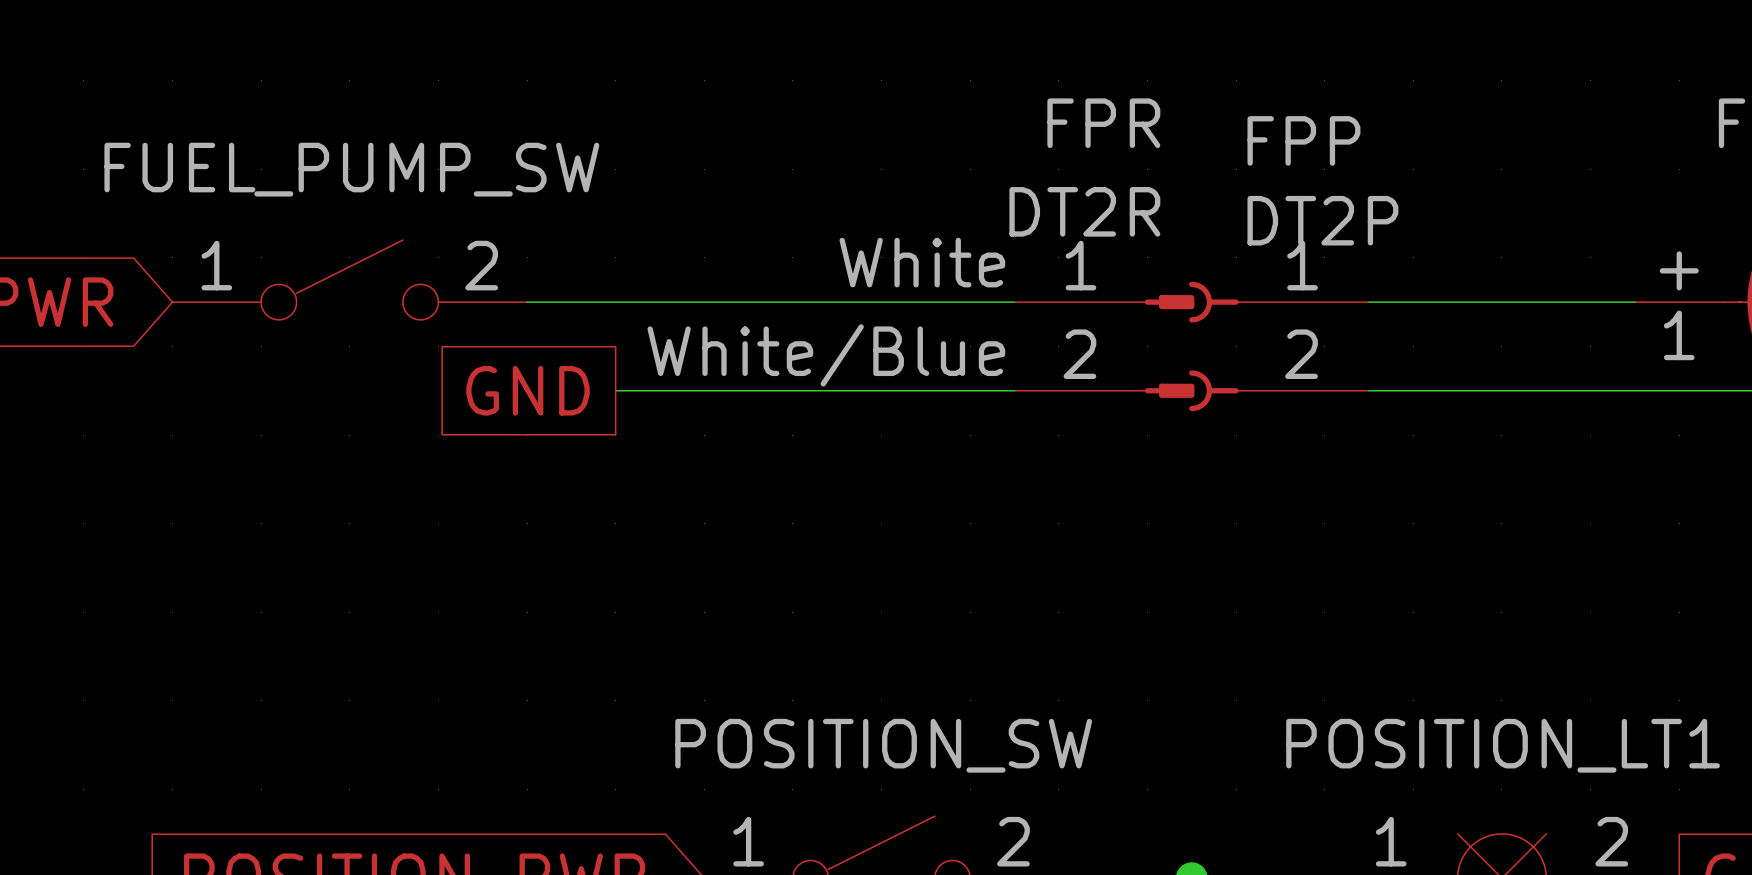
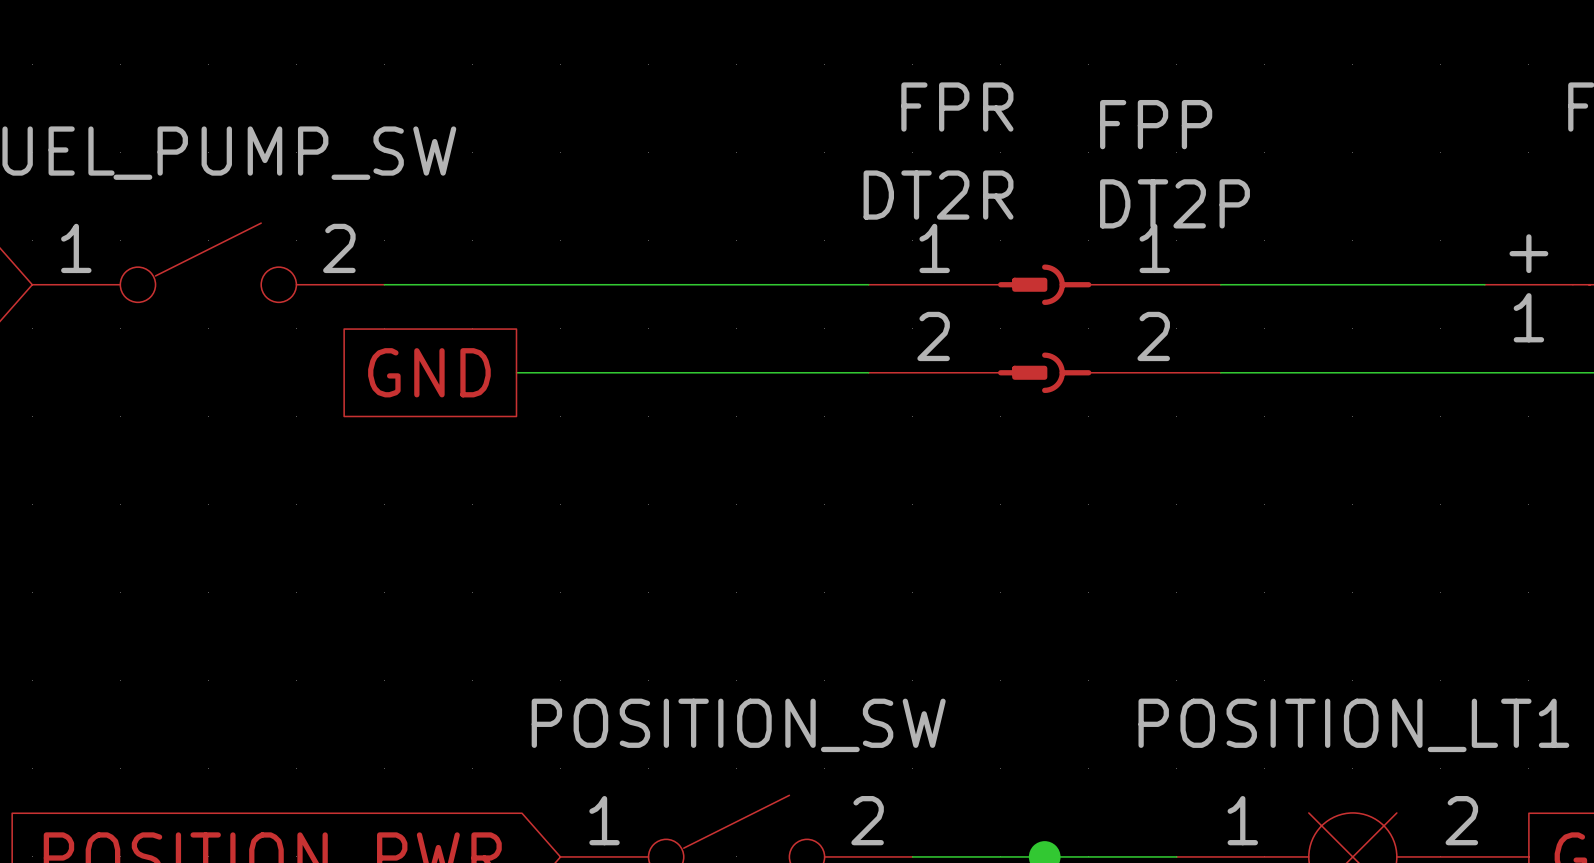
label: White (922, 262) -> none
label: White/Blue (826, 355) -> none
global label position: GND (528, 390) -> GND (429, 372)
wire: (615, 390) (659, 390) -> none

